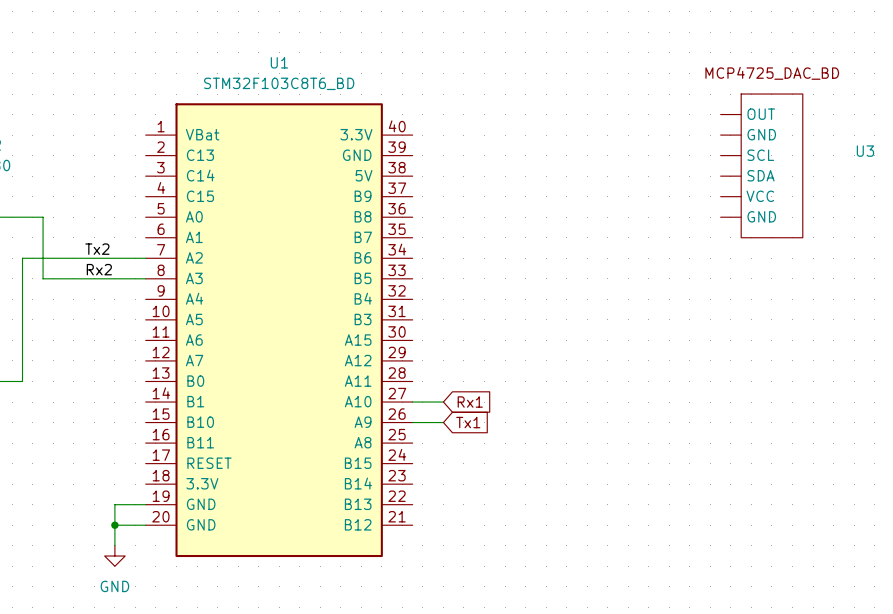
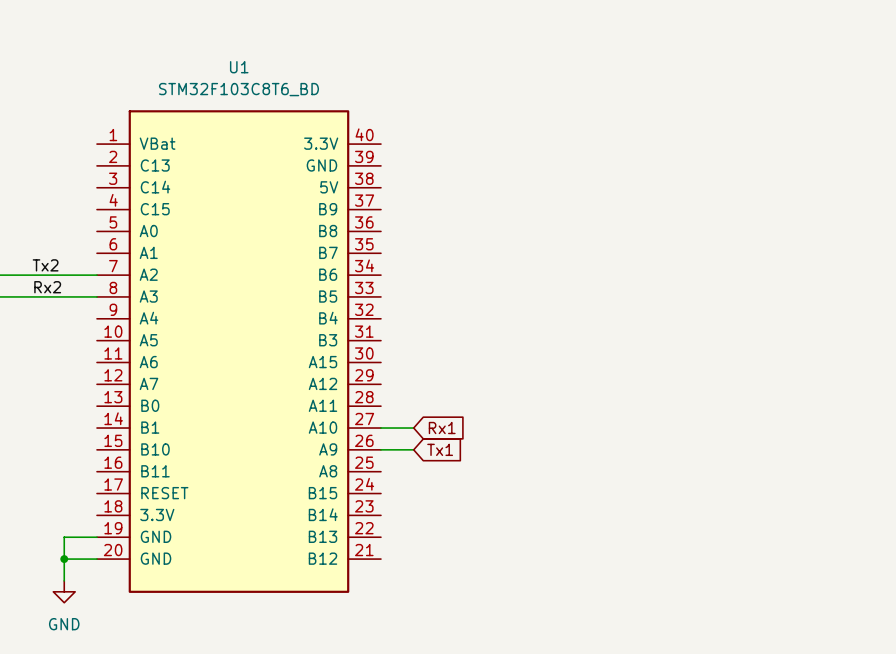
U3: (761, 165) -> none

